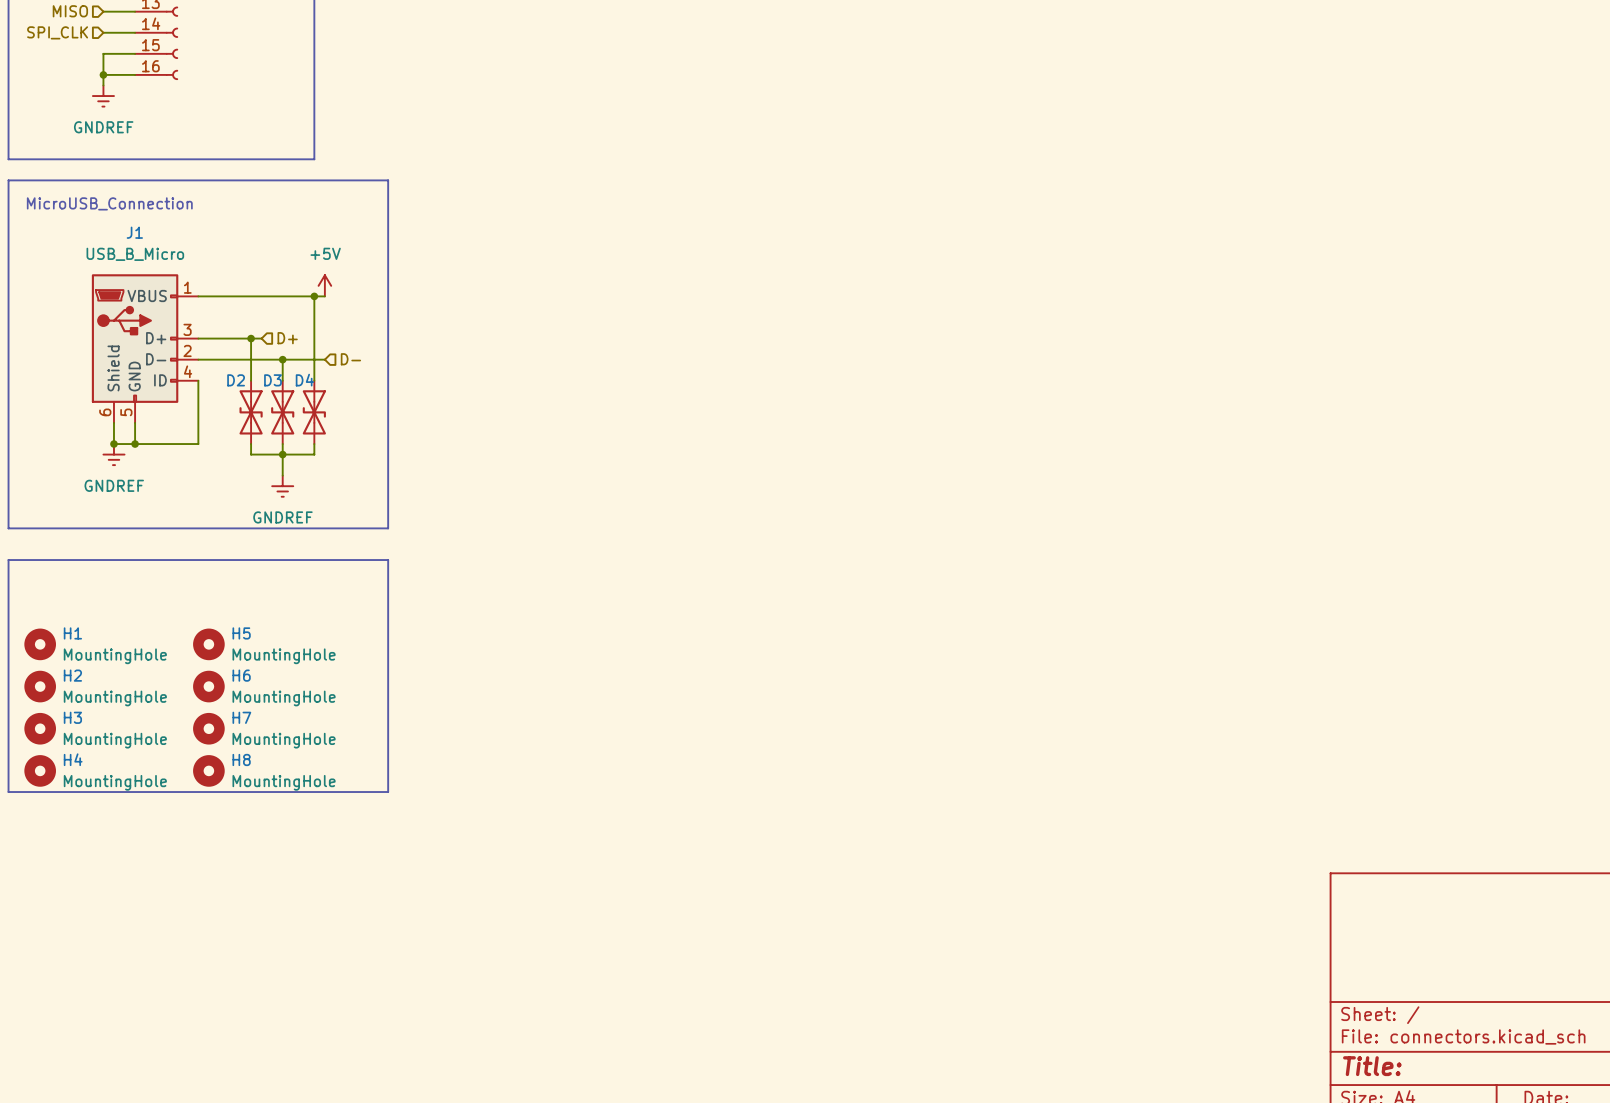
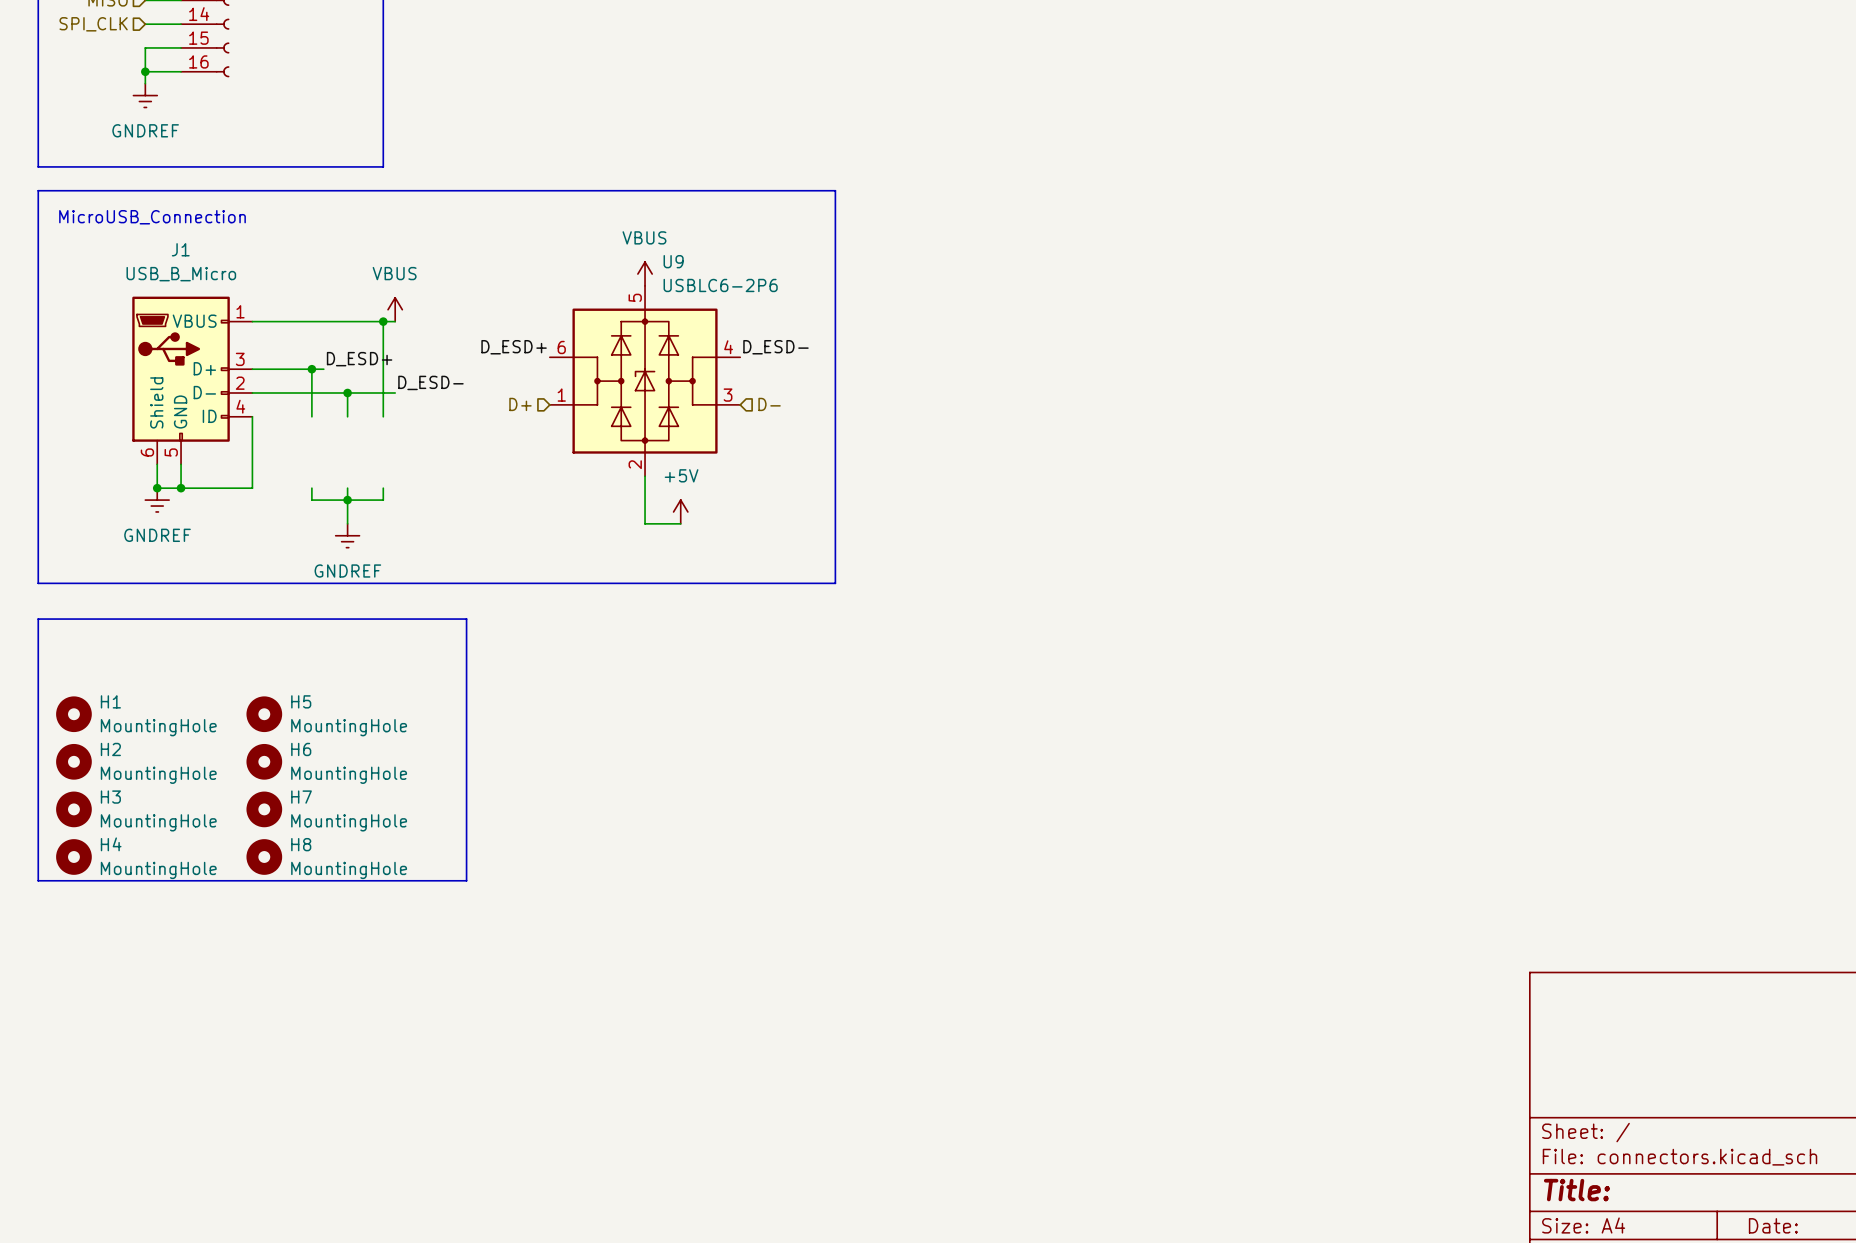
line: (388, 180) (388, 528) -> (466, 190) (835, 190) (835, 583) (466, 583)
power symbol: none -> VBUS (645, 274)
power symbol: +5V (324, 285) -> VBUS (395, 309)
label: none -> D_ESD+ (514, 347)
label: none -> D_ESD- (775, 347)
label: none -> D_ESD+ (359, 359)
hierarchical label rotation: 0° (287, 338) -> 180° (520, 404)
hierarchical label position: D+ (287, 338) -> D+ (520, 404)
U9: none -> USBLC6-2P6 (645, 381)
label: none -> D_ESD- (430, 382)
hierarchical label: D- (350, 359) -> none
hierarchical label: none -> D- (769, 404)
D2: (251, 412) -> none
D3: (282, 412) -> none
D4: (314, 412) -> none
wire: none -> (645, 476) (645, 523) (680, 523)
power symbol: none -> +5V (680, 511)

